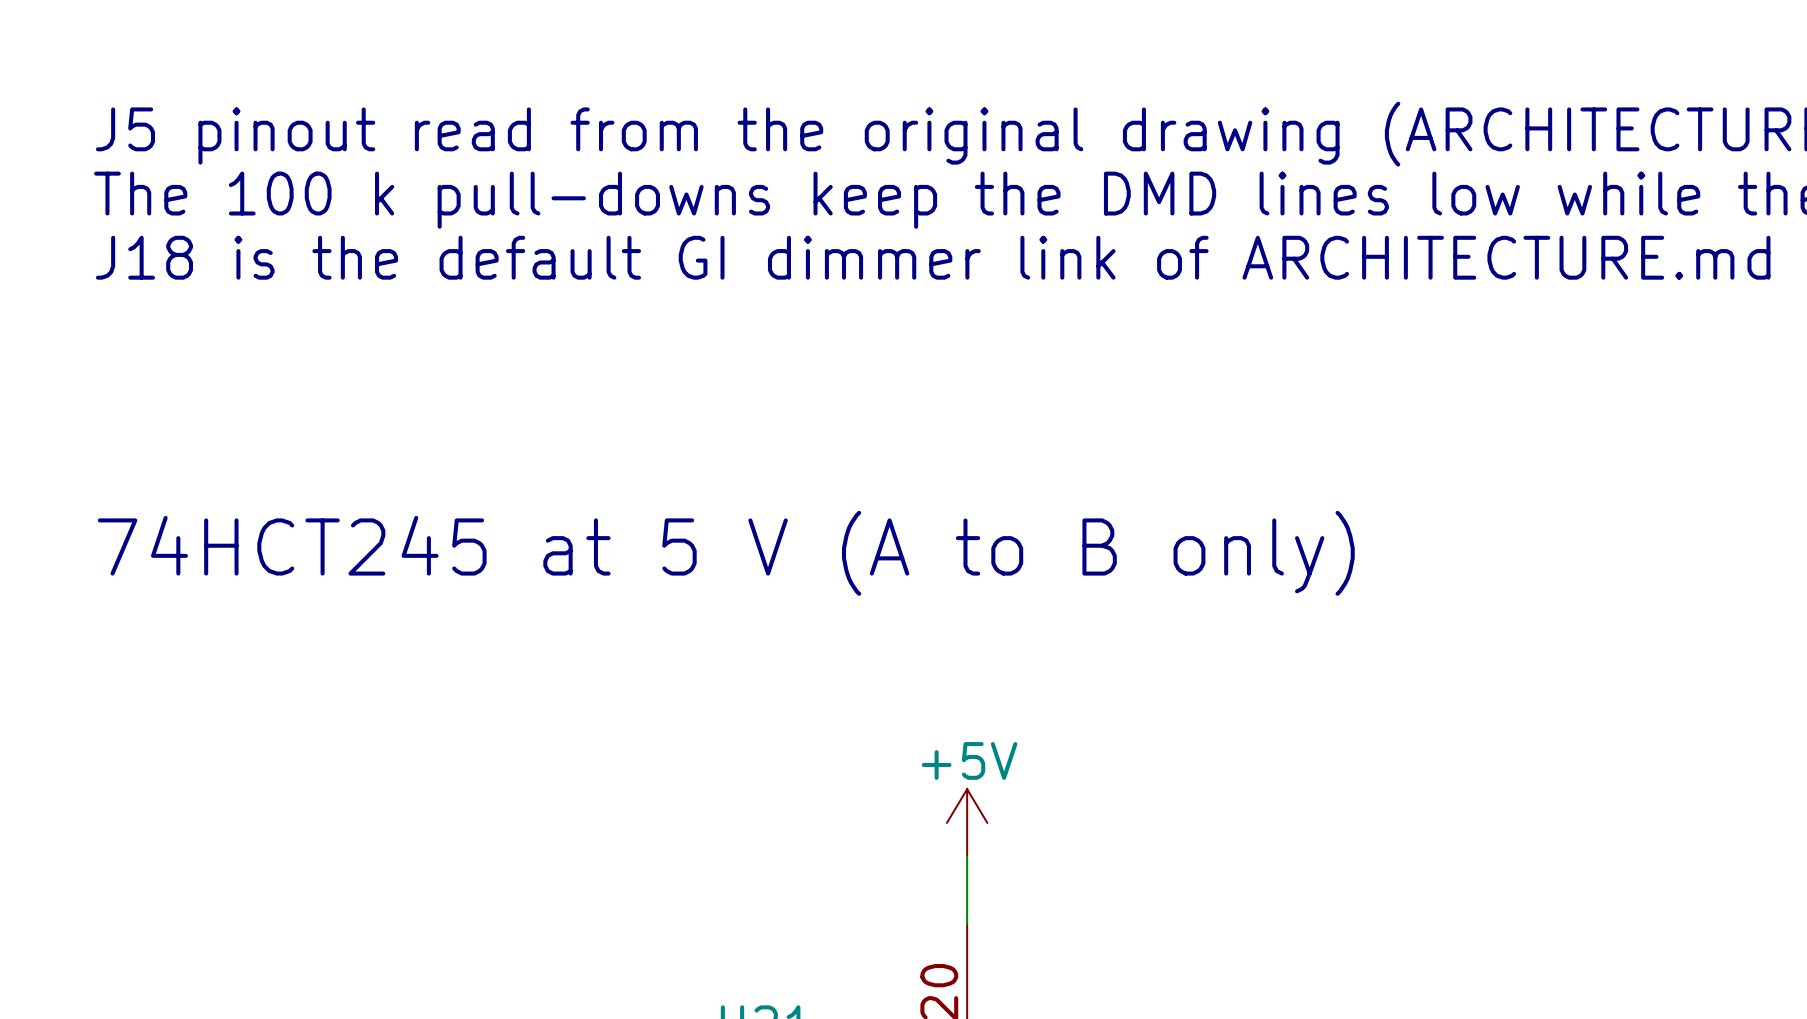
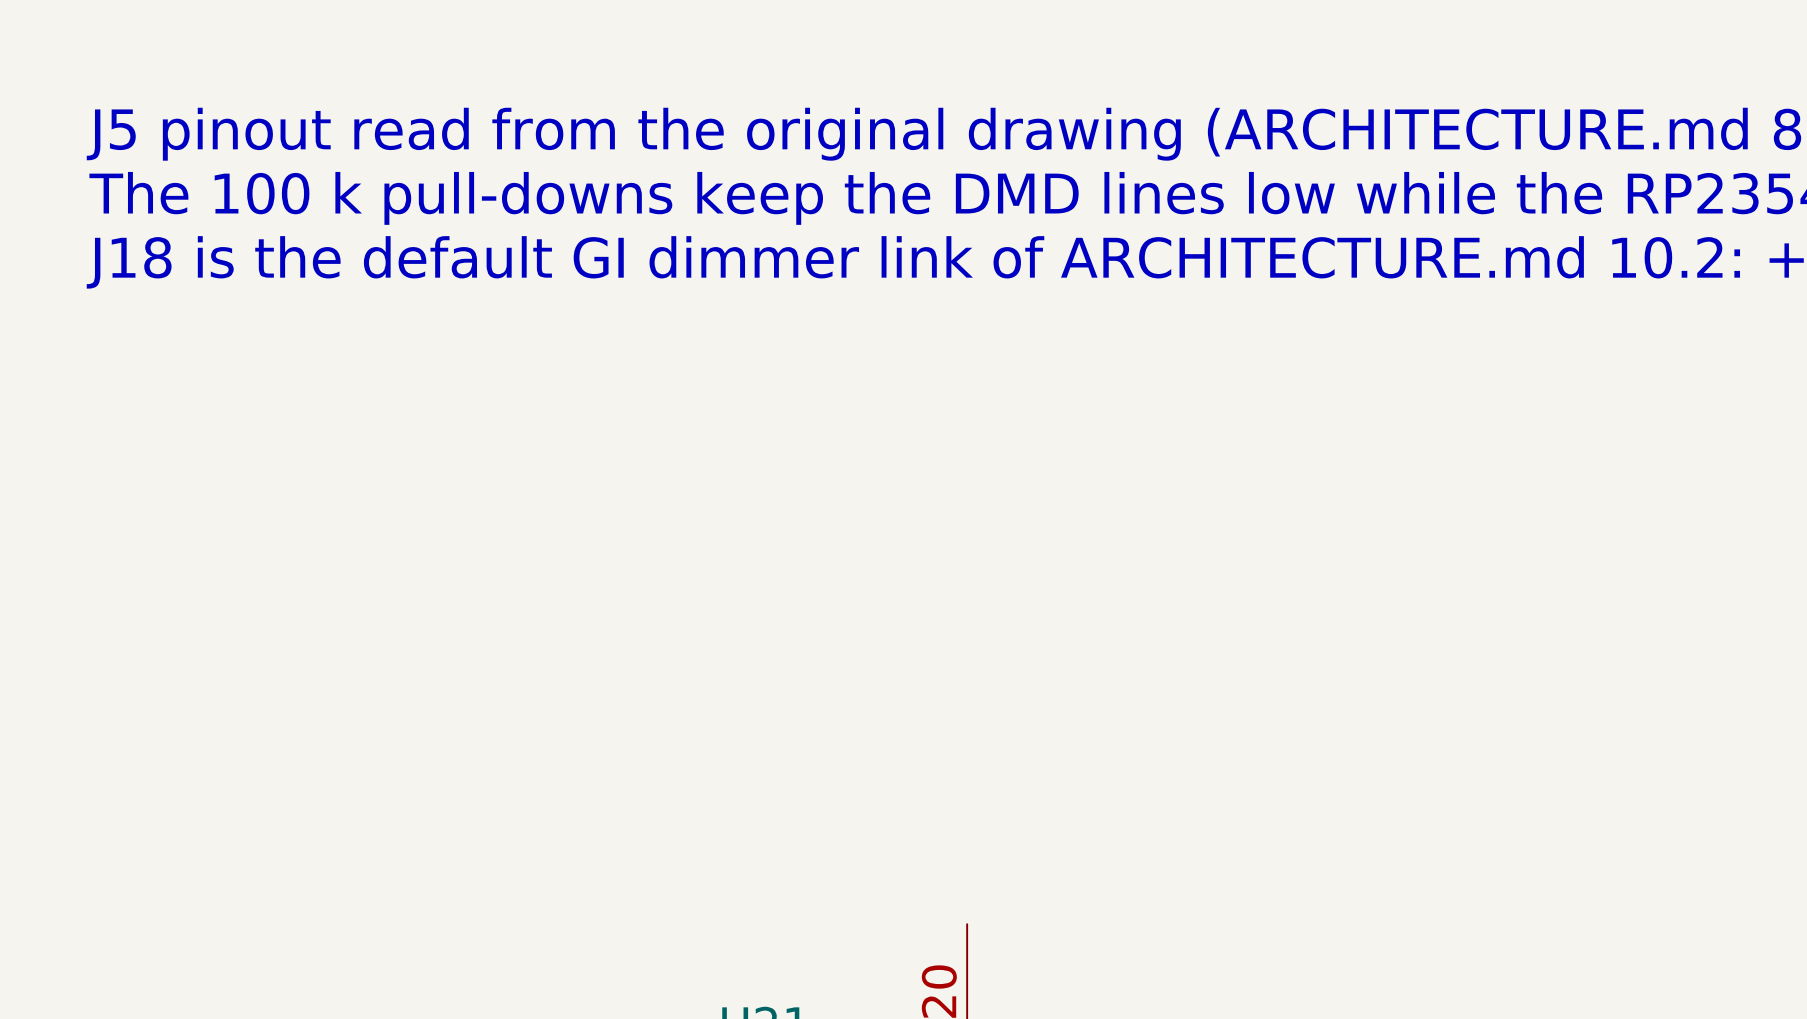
text: 74HCT245 at 5 V (A to B only) (726, 553) -> none
power symbol: +5V (967, 822) -> none
wire: (967, 856) (967, 924) -> none

